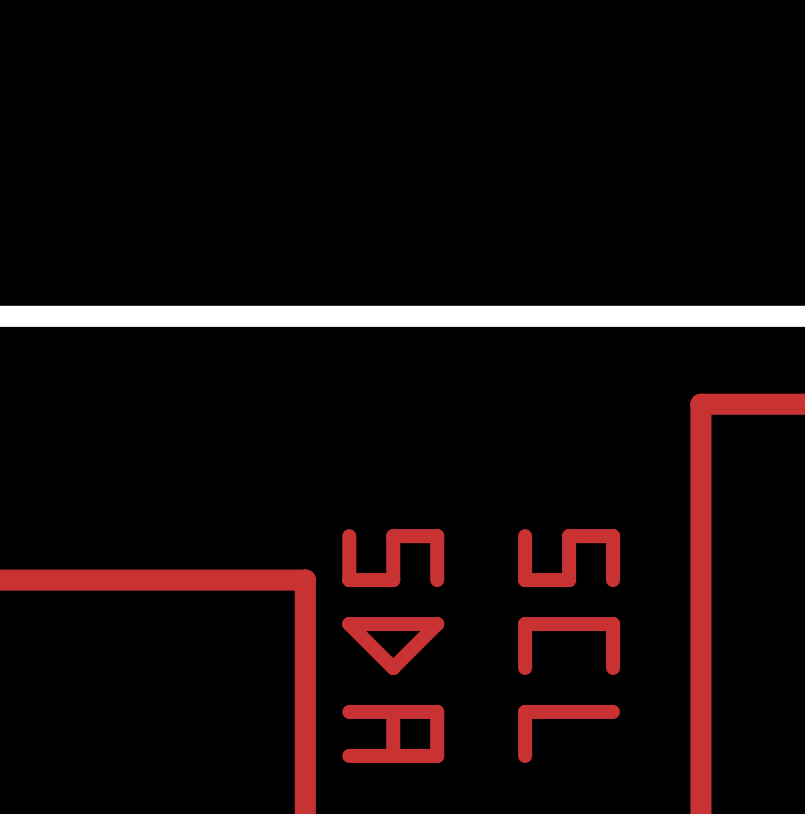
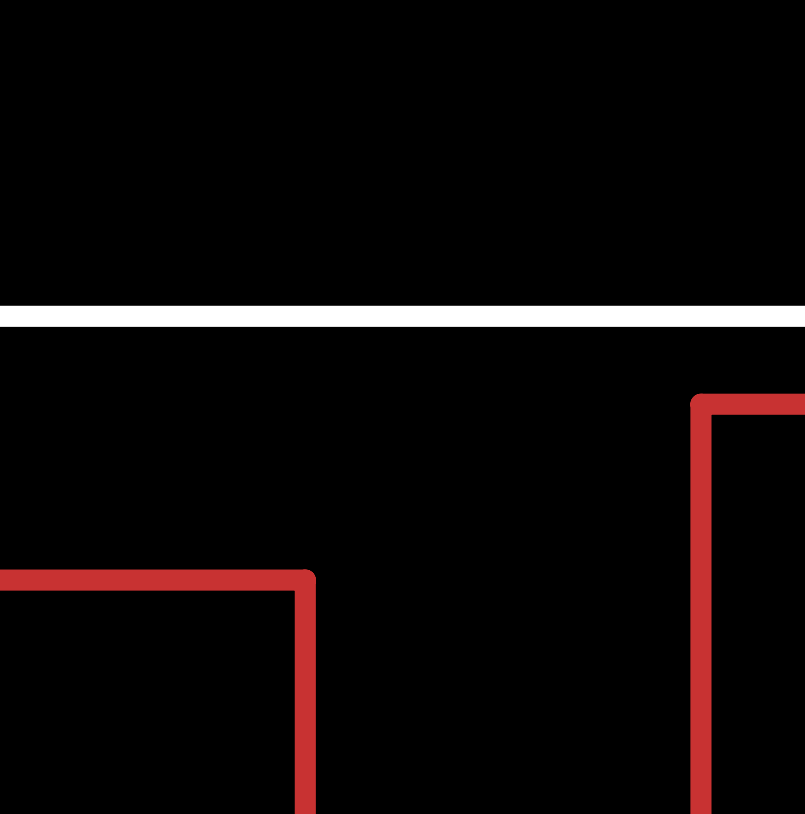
top track: (349, 536) (349, 580) (393, 580) (393, 536) (437, 536) (437, 580) -> none
top track: (525, 536) (525, 580) (569, 580) (569, 536) (613, 536) (613, 580) -> none
top track: (349, 624) (393, 667) (437, 624) (349, 624) -> none
top track: (525, 667) (525, 624) (613, 624) (613, 667) -> none
top track: (349, 711) (437, 711) (437, 755) (349, 755) -> none
top track: (393, 711) (393, 755) -> none
top track: (613, 711) (525, 711) (525, 755) -> none

